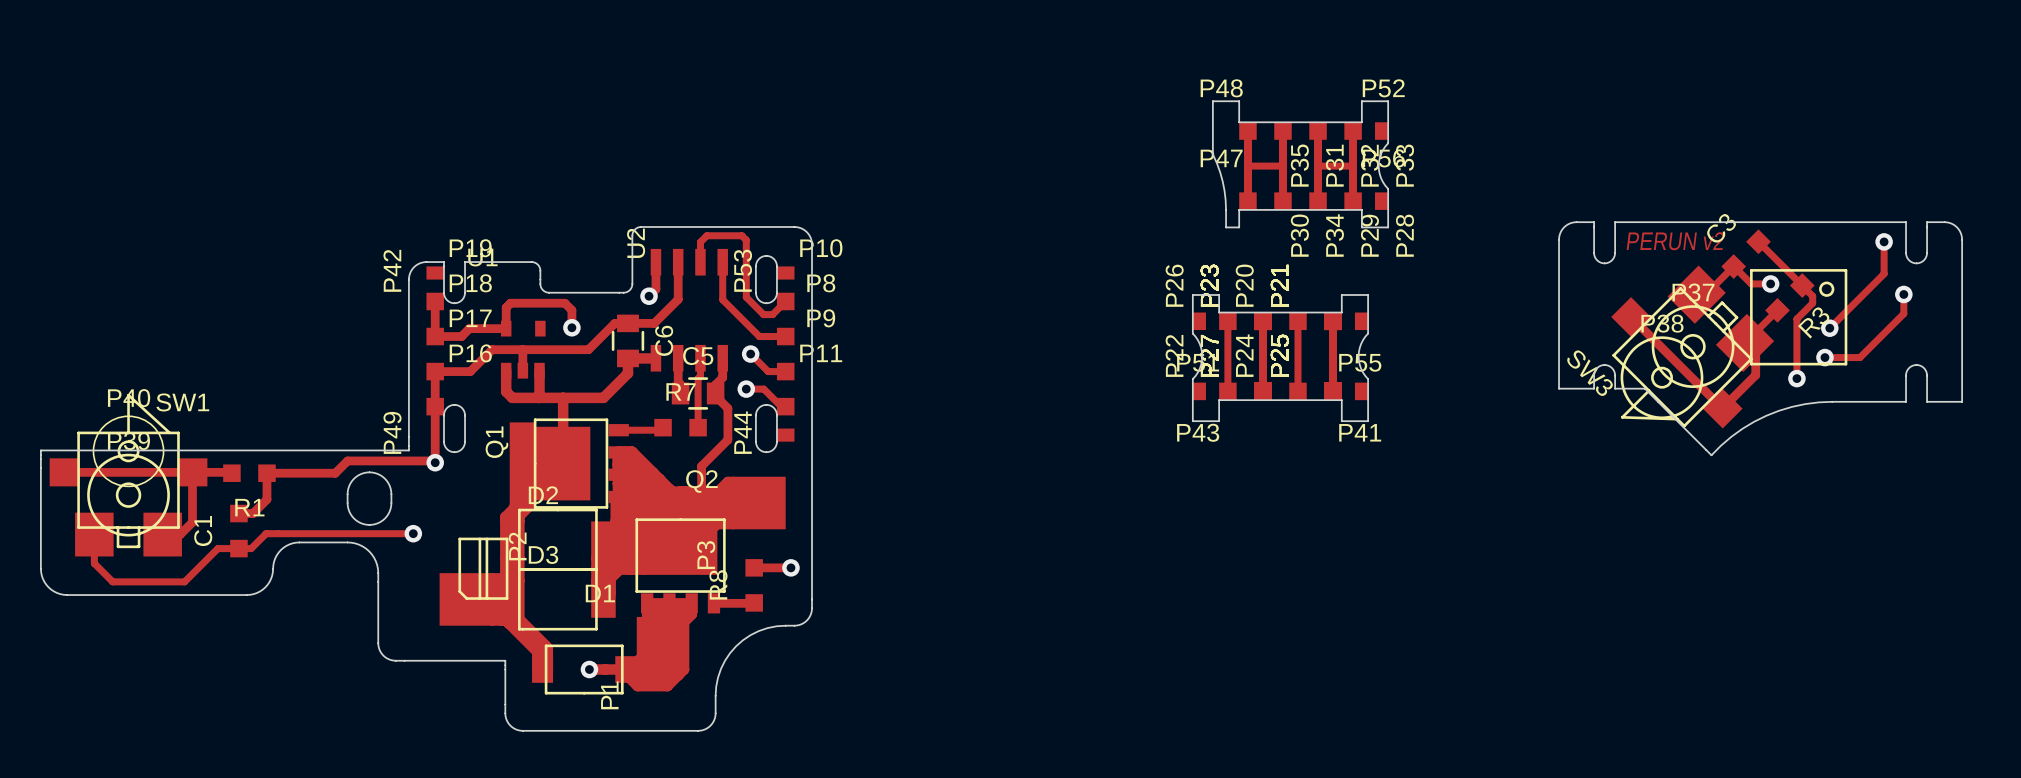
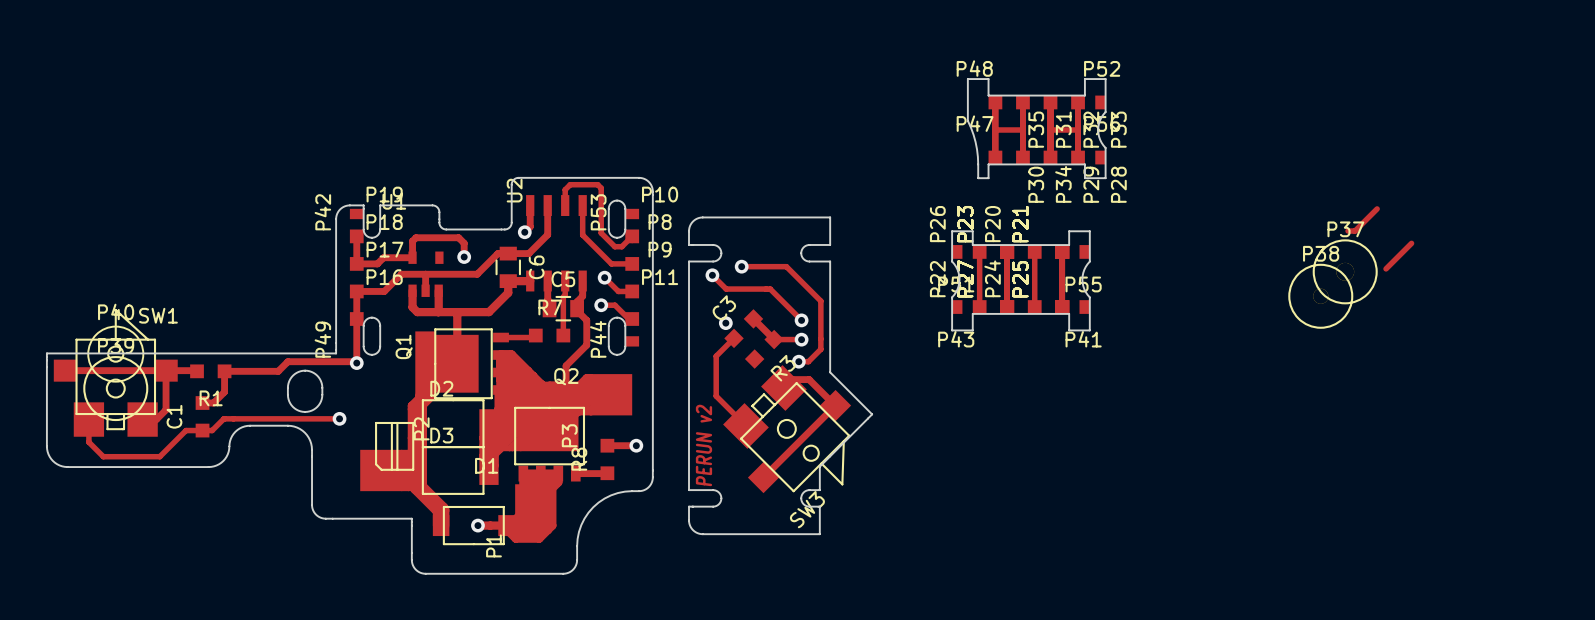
text: PERUN v2 (1675, 241) -> none
track: (1758, 241) (1802, 285) -> none
track: (1884, 241) (1884, 273) (1829, 328) -> none
via: (1884, 241) -> none
C3 position: (1746, 254) -> (743, 328)
board edge: (1604, 263) (1610, 261) (1614, 255) (1615, 222) (1906, 222) (1906, 255) (1910, 261) (1916, 263) -> none
board edge: (1604, 263) (1598, 261) (1594, 255) (1594, 222) (1572, 222) (1562, 229) (1559, 239) (1559, 388) (1594, 388) (1595, 370) (1600, 365) (1608, 365) (1614, 372) (1615, 388) (1644, 388) (1711, 455) -> none
board edge: (1916, 263) (1922, 261) (1926, 255) (1927, 222) (1949, 222) (1958, 229) (1962, 239) (1962, 401) (1927, 401) (1926, 371) (1920, 365) (1913, 365) (1906, 372) (1906, 401) (1818, 402) (1792, 406) (1754, 421) (1731, 436) (1711, 455) -> none
track: (1733, 266) (1751, 283) (1770, 283) -> none
via: (1770, 283) -> none
track: (1802, 285) (1812, 296) (1812, 303) (1796, 319) (1796, 378) -> none
track: (1903, 294) (1903, 313) (1860, 357) (1824, 357) -> none
via: (1903, 294) -> none
R3 position: (1789, 297) -> (764, 349)
track: (1631, 317) (1722, 408) (1755, 375) (1755, 353) (1745, 342) -> none
part: (1798, 317) -> none
board edge: none -> (801, 253) (802, 258) (807, 261) (830, 261) (830, 372) (872, 414) (819, 466) (819, 490) (809, 490)
board edge: none -> (801, 253) (802, 248) (807, 245) (830, 244) (830, 217) (697, 218) (689, 227) (689, 244) (718, 246) (721, 251) (720, 256) (713, 261)
via: (1829, 328) -> none
board edge: none -> (713, 261) (689, 261) (689, 490) (715, 490) (719, 493) (721, 498)
track: none -> (741, 266) (786, 266) (820, 301) (820, 349) (808, 361) (798, 361)
via: none -> (741, 266)
SW3 rotation: 0° (1692, 347) -> 90° counterclockwise (787, 429)
SW3 position: (1692, 347) -> (787, 429)
track: none -> (712, 275) (726, 289) (770, 289) (801, 320)
via: none -> (712, 275)
via: (1824, 357) -> none
via: (1796, 378) -> none
track: none -> (753, 318) (774, 339) (801, 339)
via: none -> (801, 320)
via: none -> (725, 323)
track: none -> (734, 338) (716, 356) (716, 396) (745, 425)
via: none -> (801, 339)
via: none -> (798, 361)
track: none -> (783, 384) (783, 388) (792, 379) (809, 379) (835, 406) (763, 477)
text: none -> PERUN v2 (703, 445)
board edge: none -> (809, 490) (802, 493) (801, 500) (807, 506) (819, 506) (819, 534) (702, 534) (694, 531) (689, 523) (689, 506) (715, 506) (719, 503) (721, 498)

